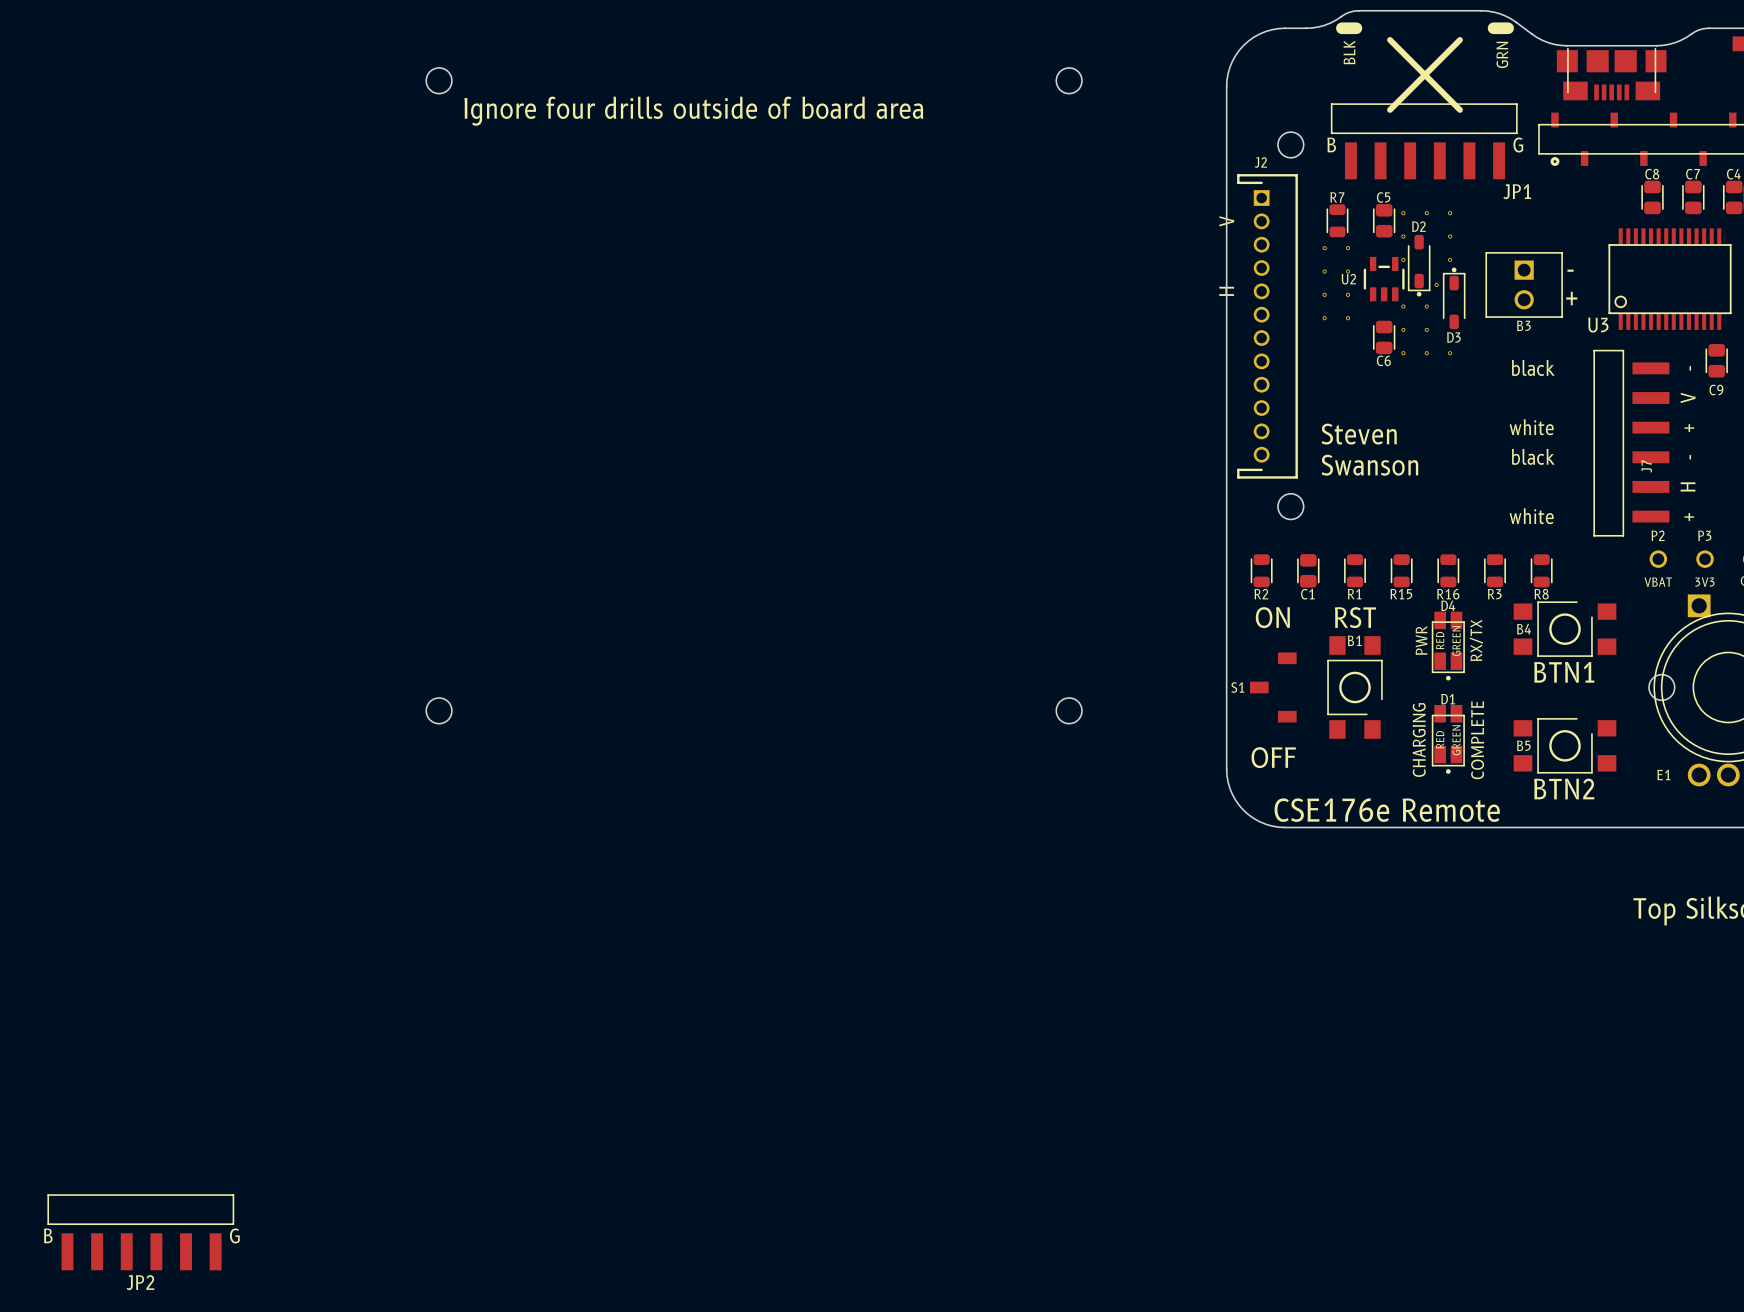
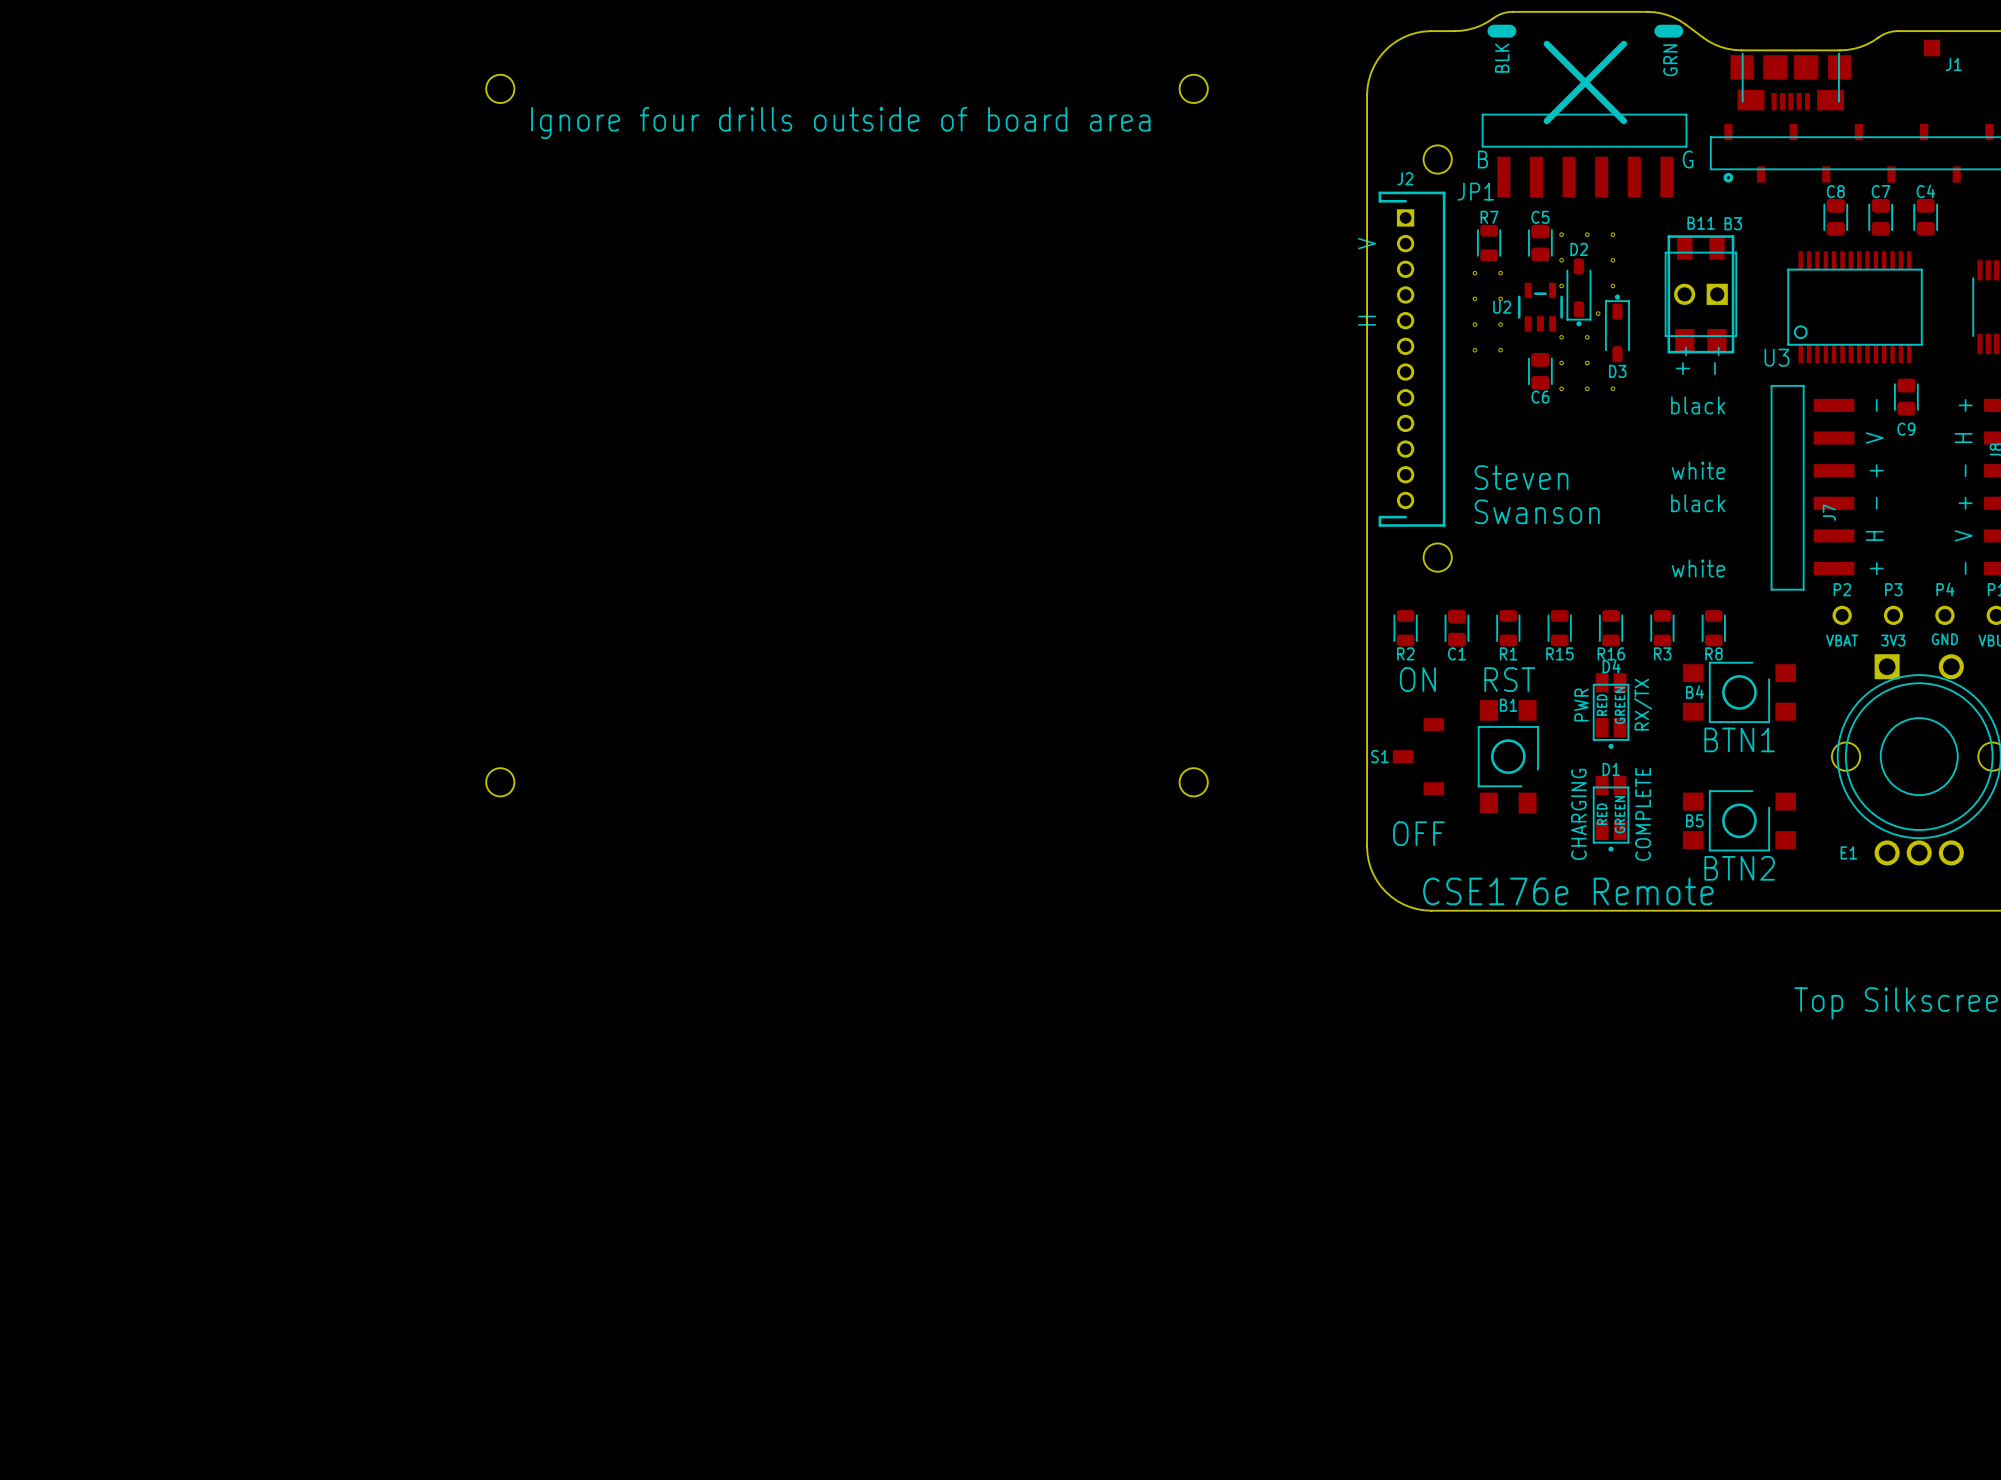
JP1 name position: JP1 (1517, 191) -> JP1 (1475, 191)
B3 footprint: [1485, 252, 1563, 318] -> [1667, 235, 1735, 354]
B11: none -> (1700, 294)
B3 text: - (1570, 270) -> + (1682, 368)
B3 text: + (1571, 298) -> - (1715, 368)
B3 name position: B3 (1523, 325) -> B3 (1733, 223)
JP2: (140, 1232) -> none

